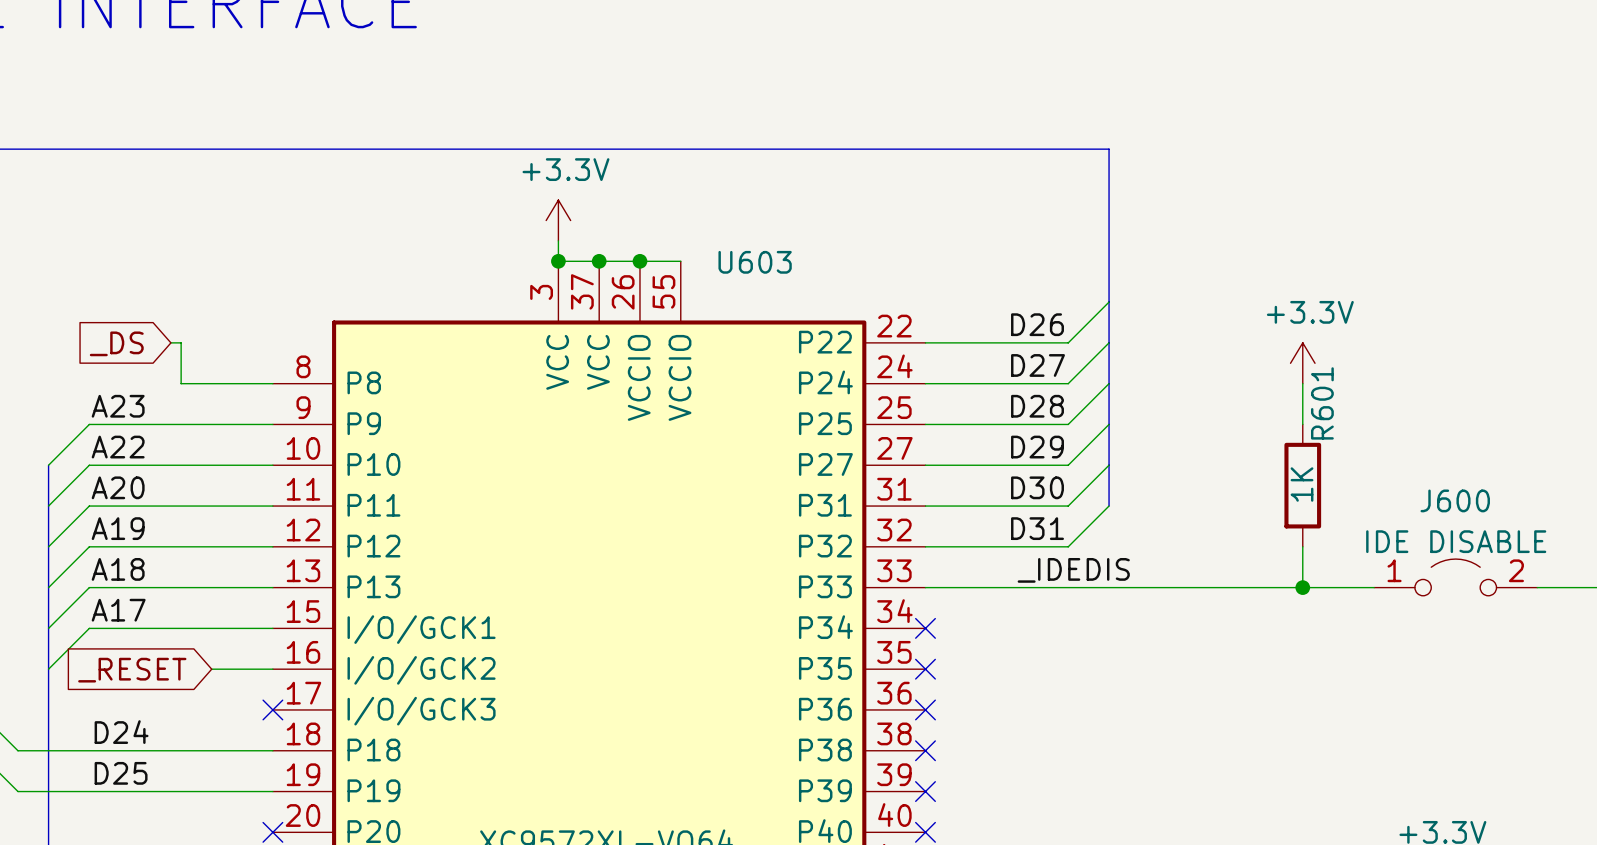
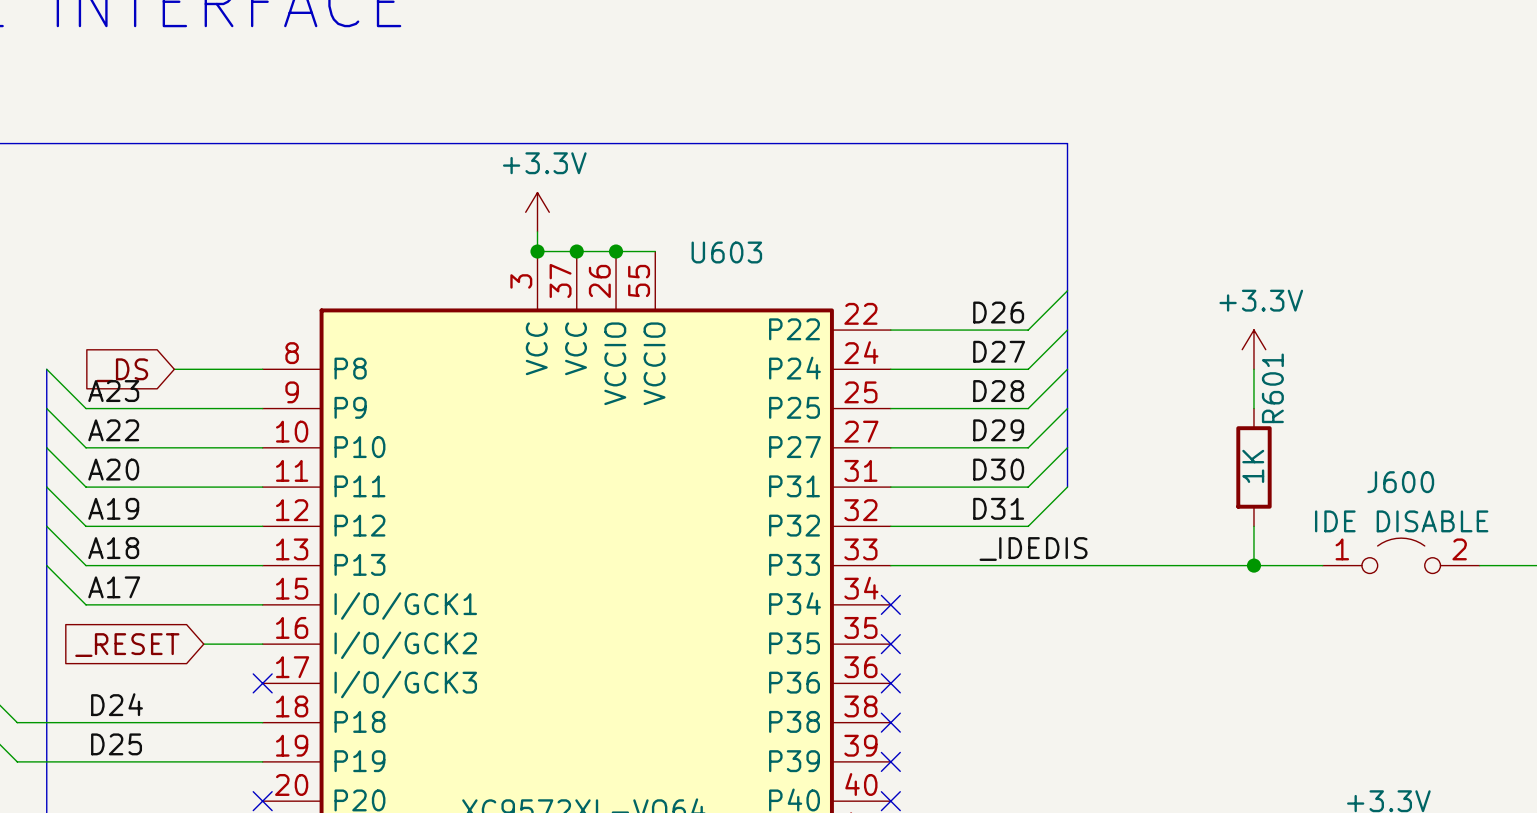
wire: (170, 342) (181, 342) (181, 383) -> none
global label position: _DS (116, 343) -> _DS (122, 370)
wire: none -> (46, 369) (86, 408)
bus: none -> (46, 369) (46, 447)
wire: (89, 424) (48, 465) -> (86, 487) (46, 447)
wire: (89, 465) (48, 506) -> (86, 447) (46, 408)
wire: (89, 506) (48, 546) -> (86, 565) (46, 526)
wire: (89, 546) (48, 587) -> (86, 526) (46, 487)
wire: (89, 587) (48, 628) -> none
wire: (89, 628) (48, 669) -> (86, 604) (46, 565)

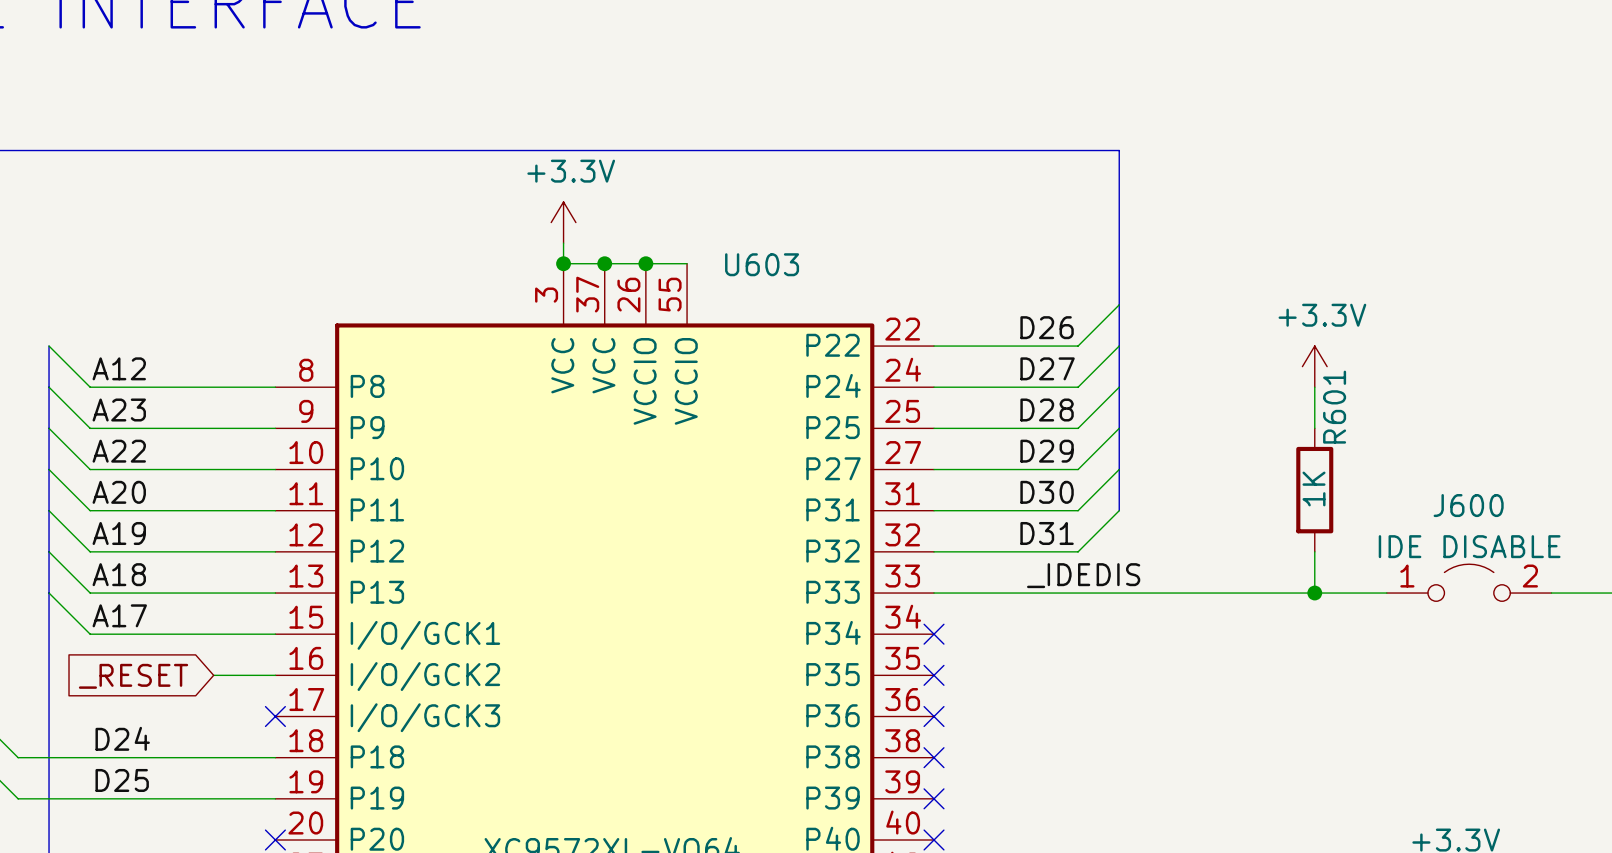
wire: none -> (49, 346) (90, 387)
bus: none -> (49, 346) (49, 387)
label: none -> A12 (119, 368)
wire: none -> (90, 387) (182, 387)
global label: _DS (122, 370) -> none

